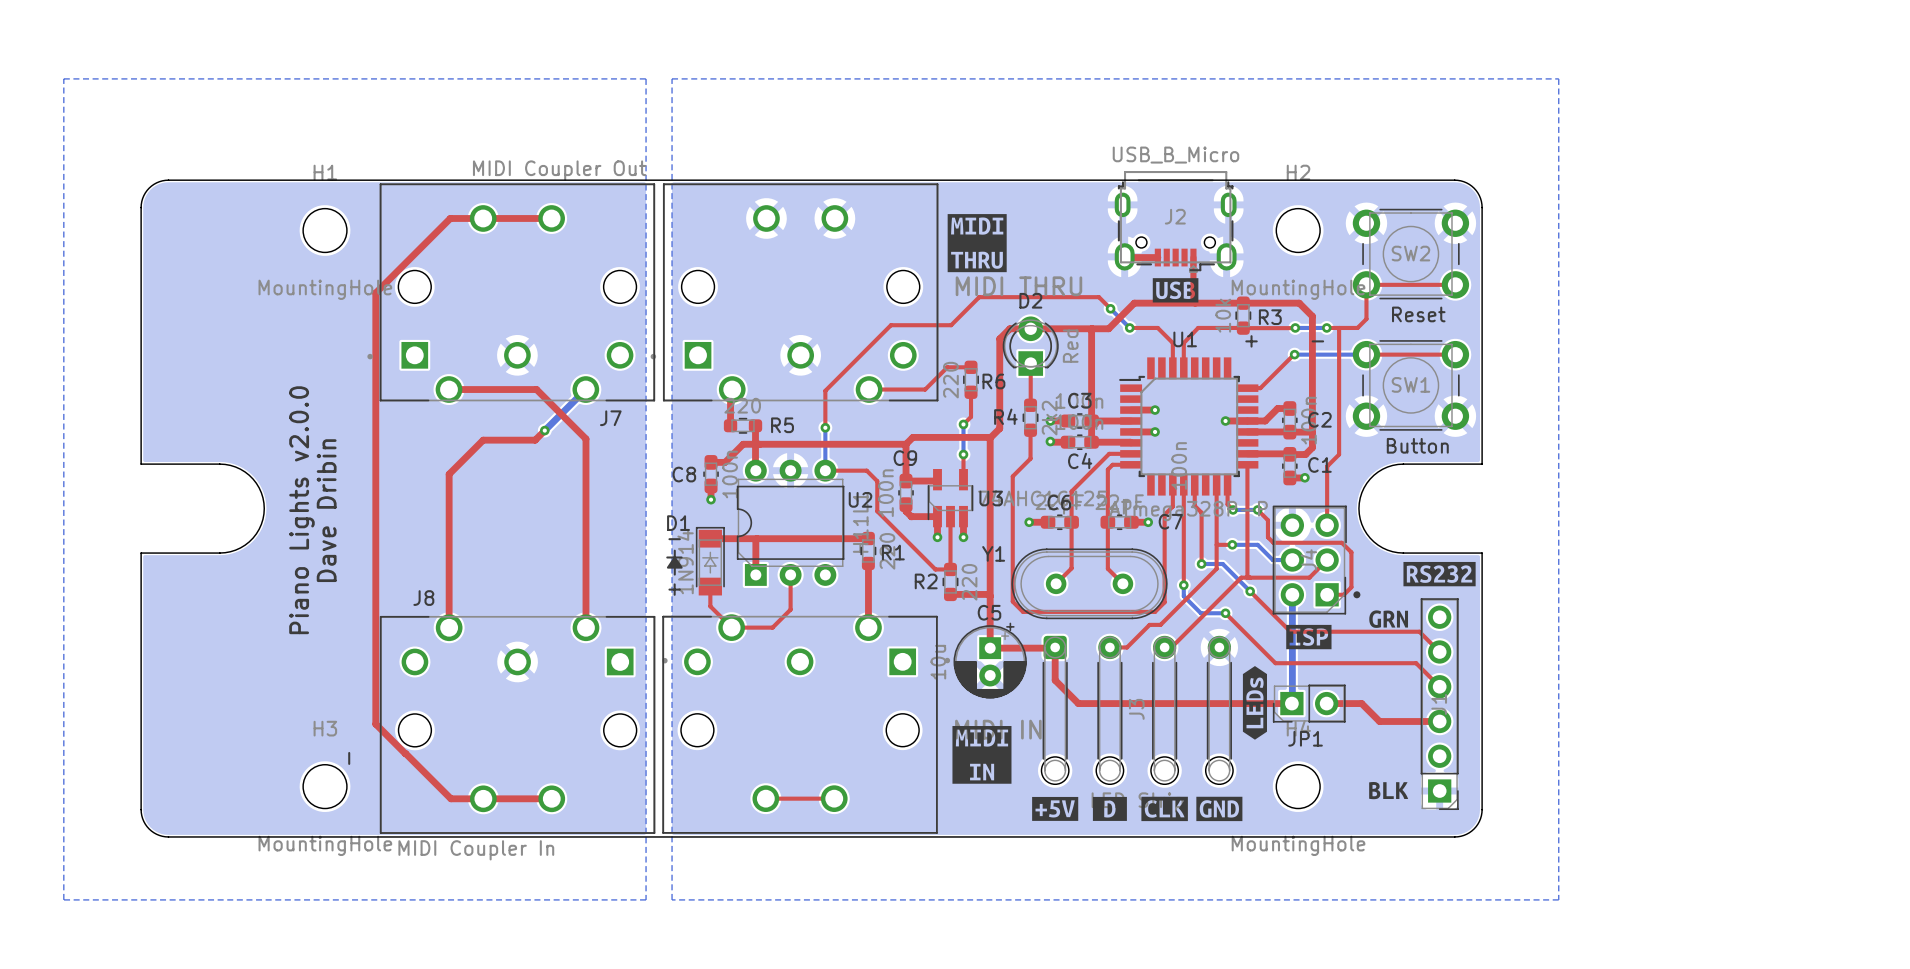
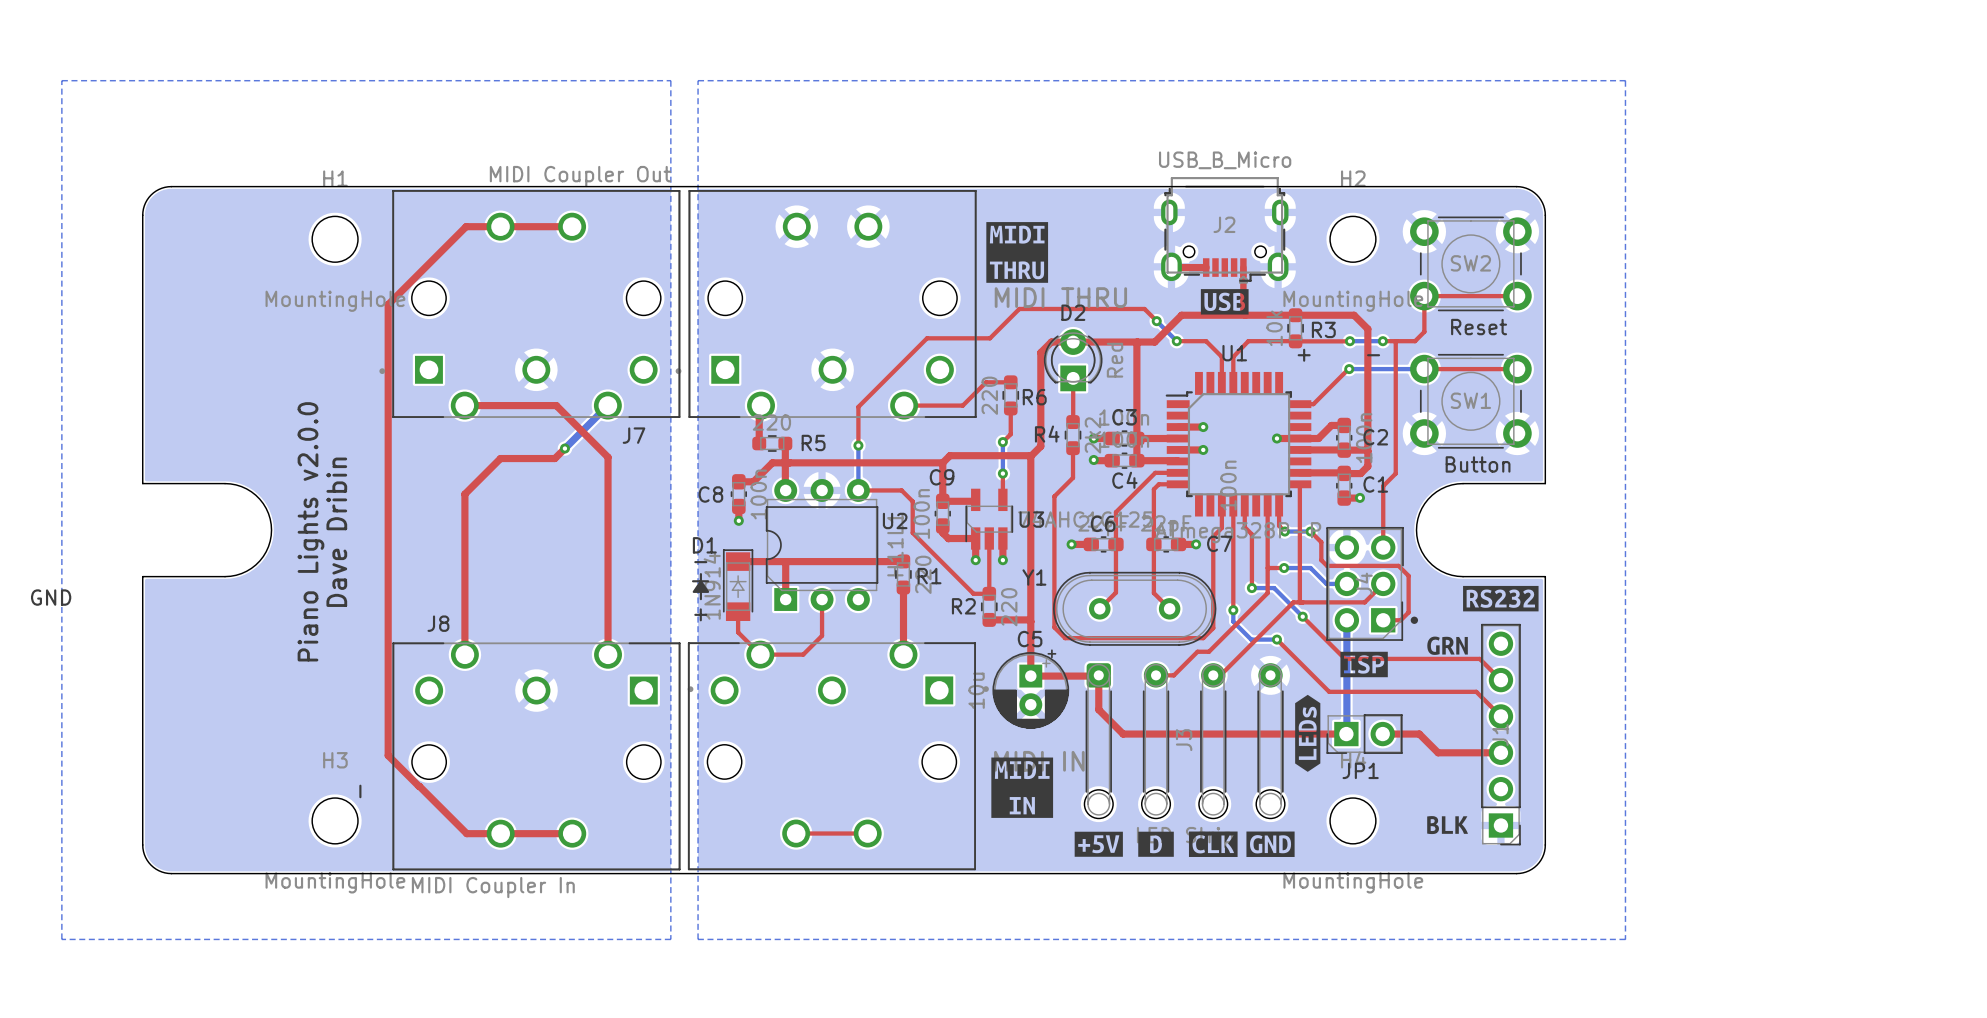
text: none -> GND (51, 597)

